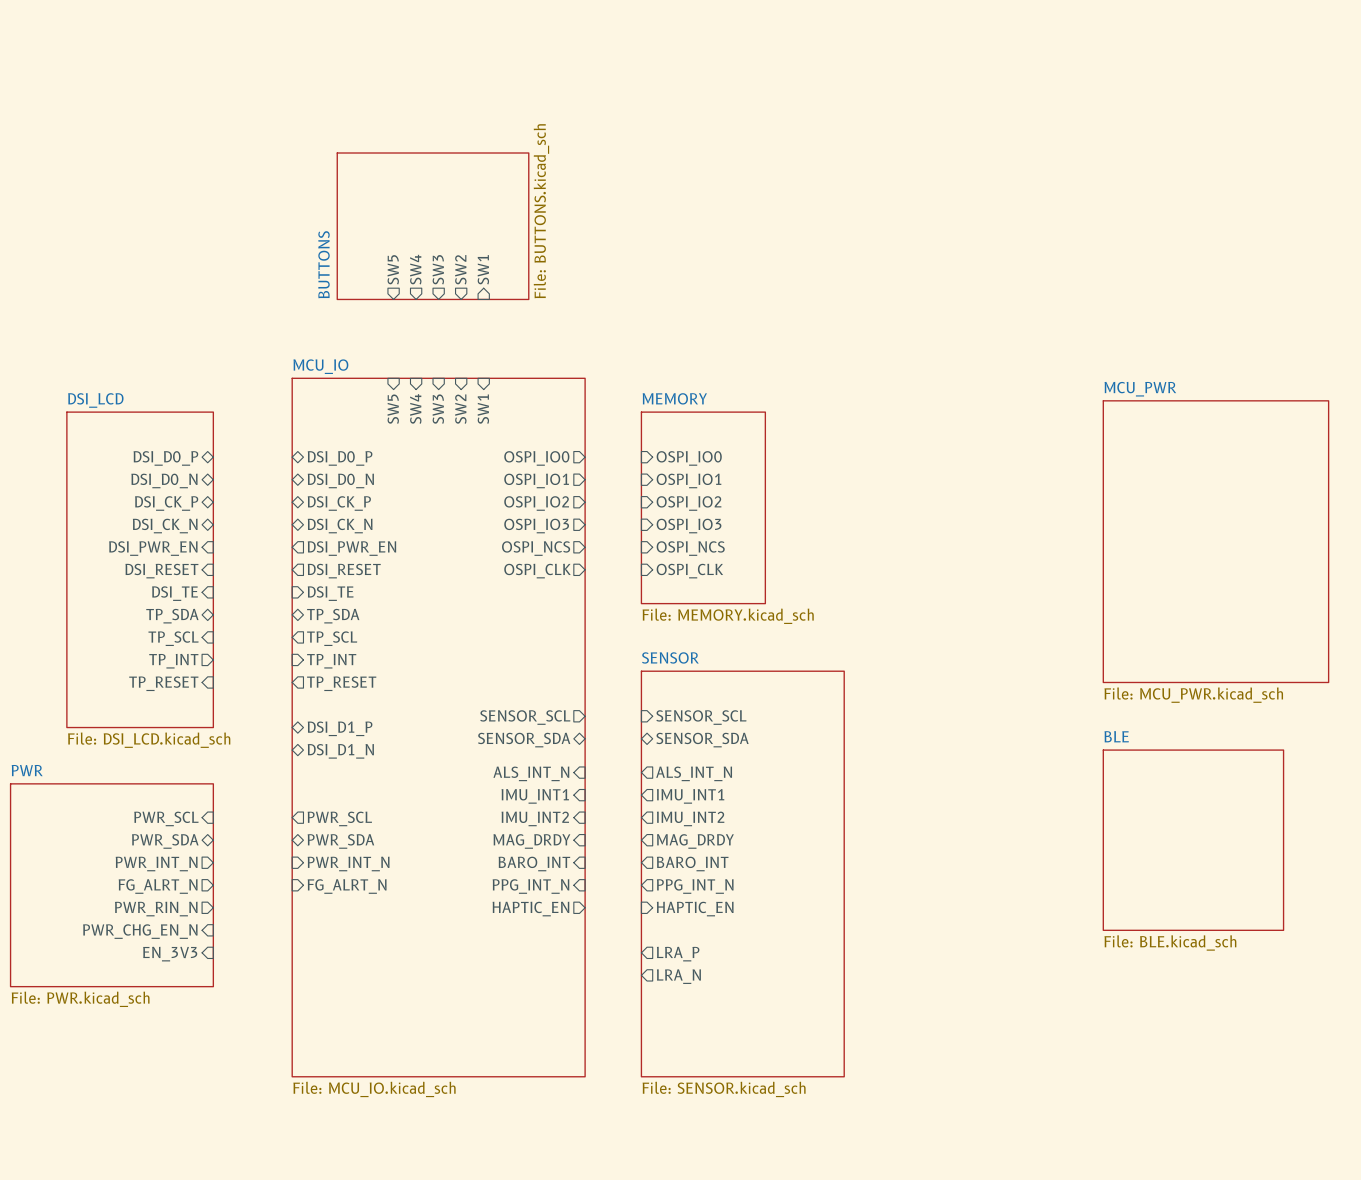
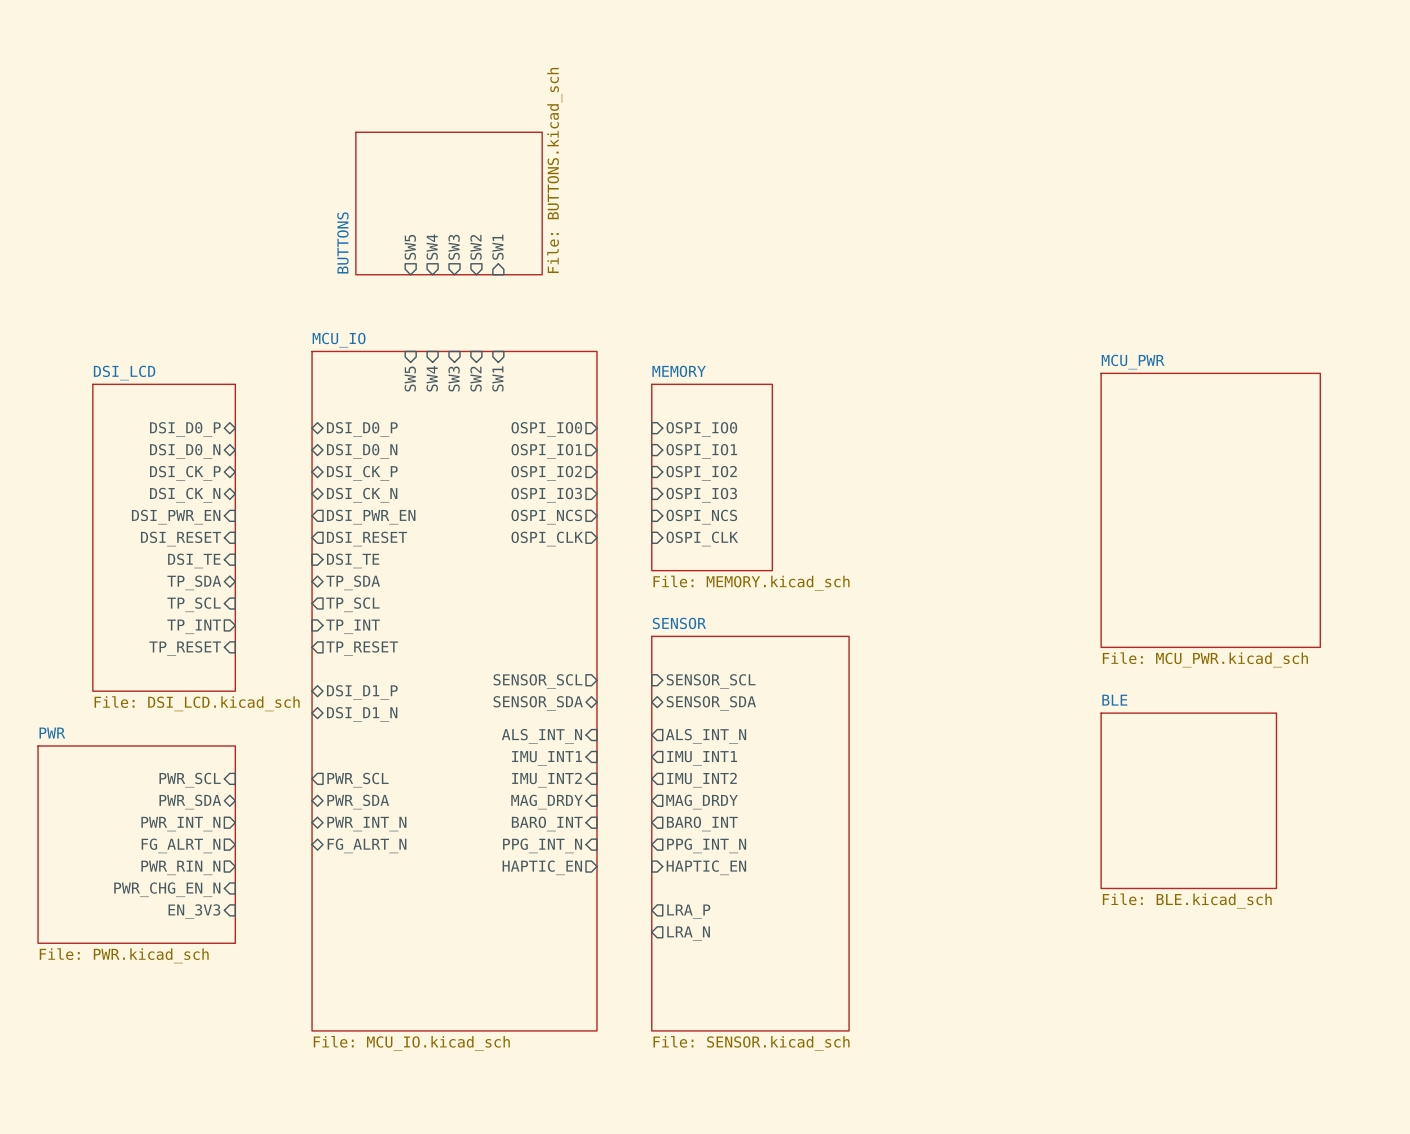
sheet pin shape: input (348, 863) -> bidirectional (366, 824)
sheet pin shape: input (347, 886) -> bidirectional (367, 845)

